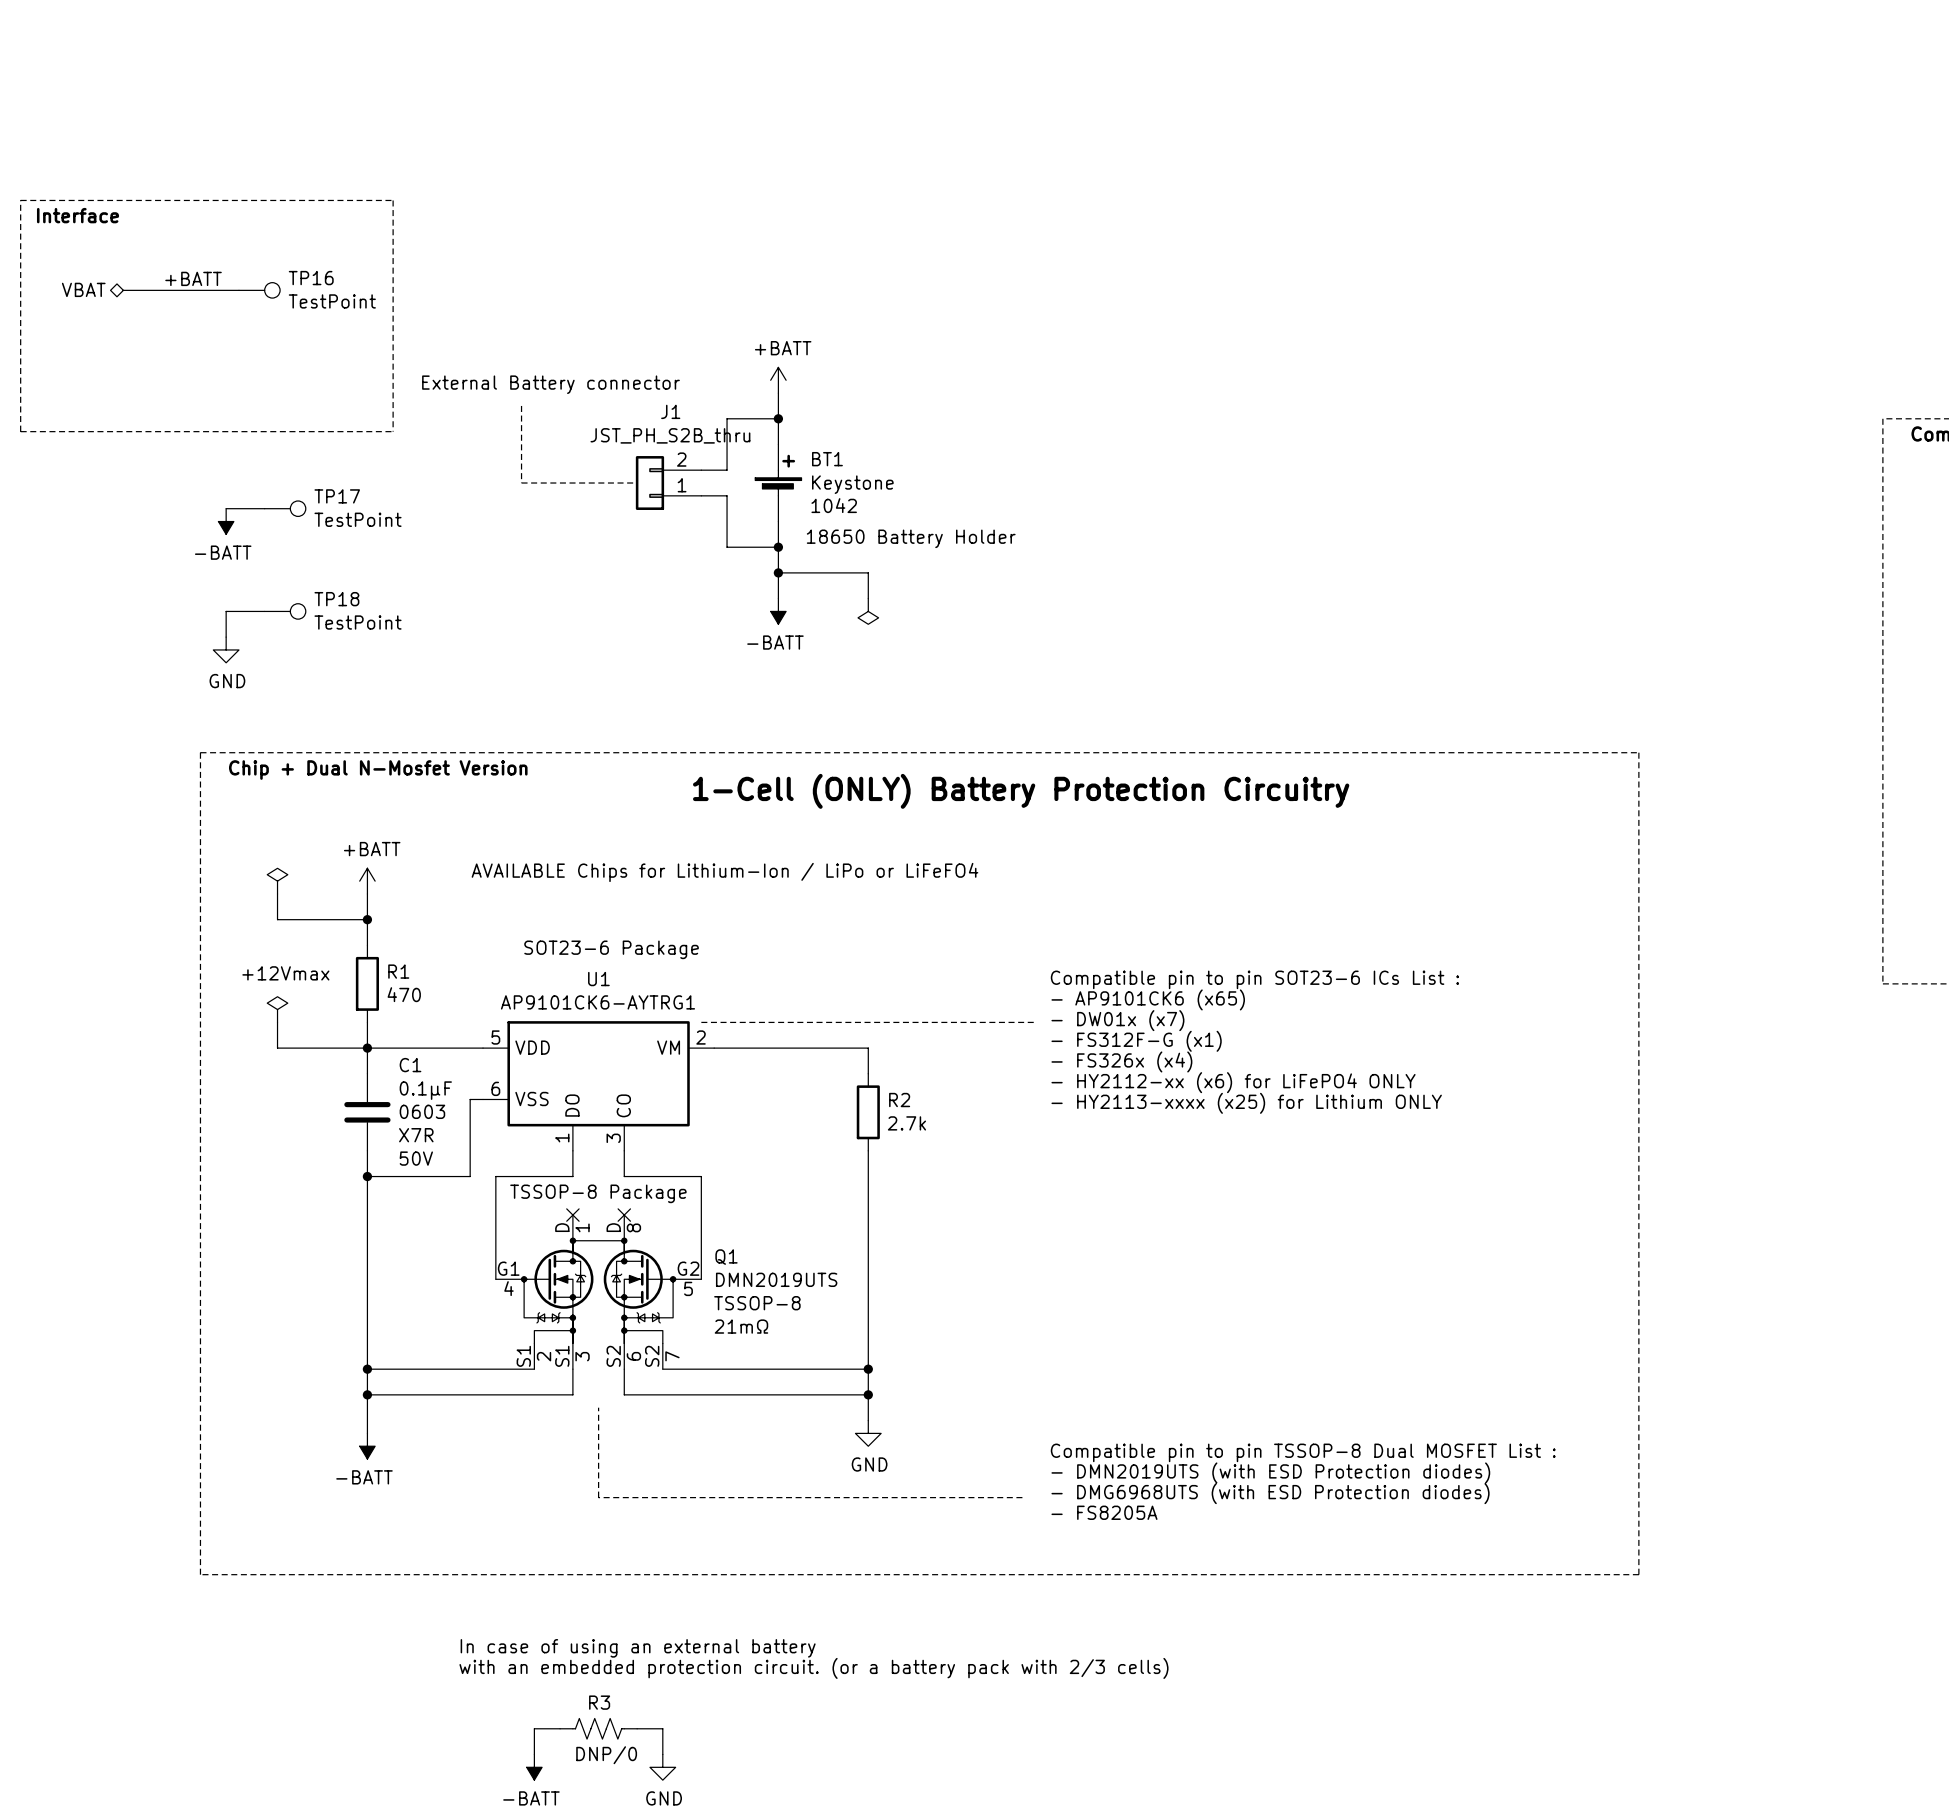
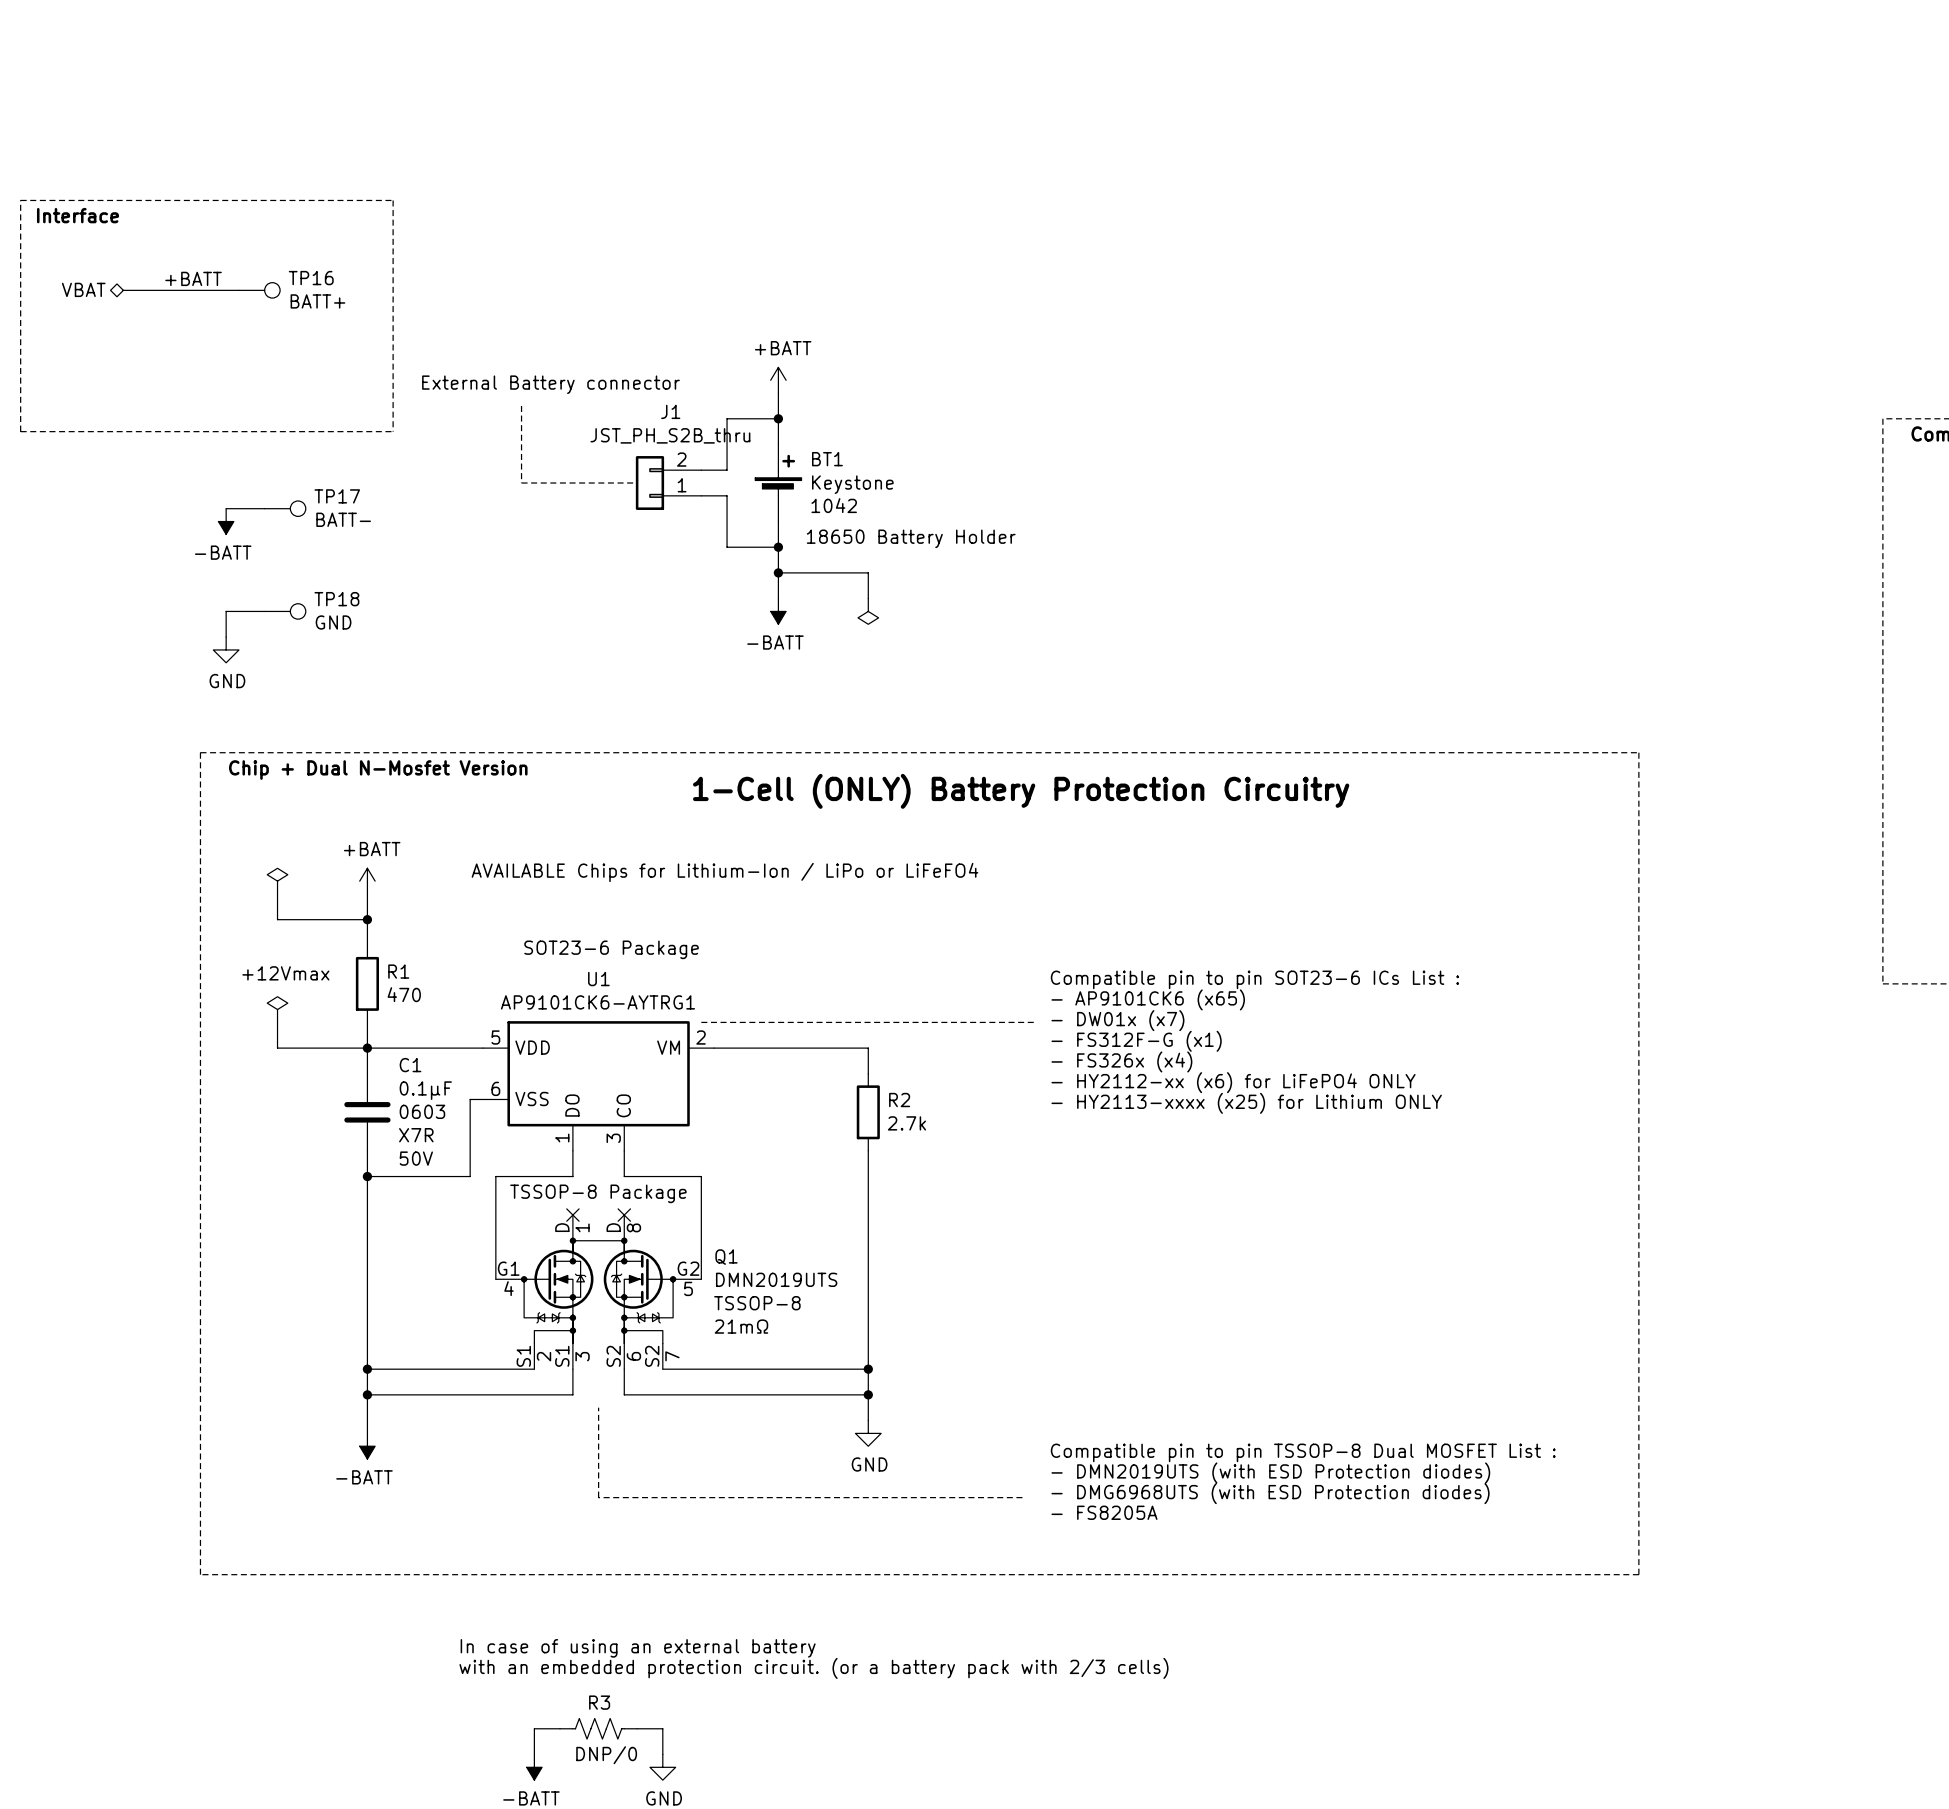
TP16 value: TestPoint (332, 301) -> BATT+ (317, 301)
TP17 value: TestPoint (358, 519) -> BATT- (343, 519)
TP18 value: TestPoint (358, 622) -> GND (333, 622)

